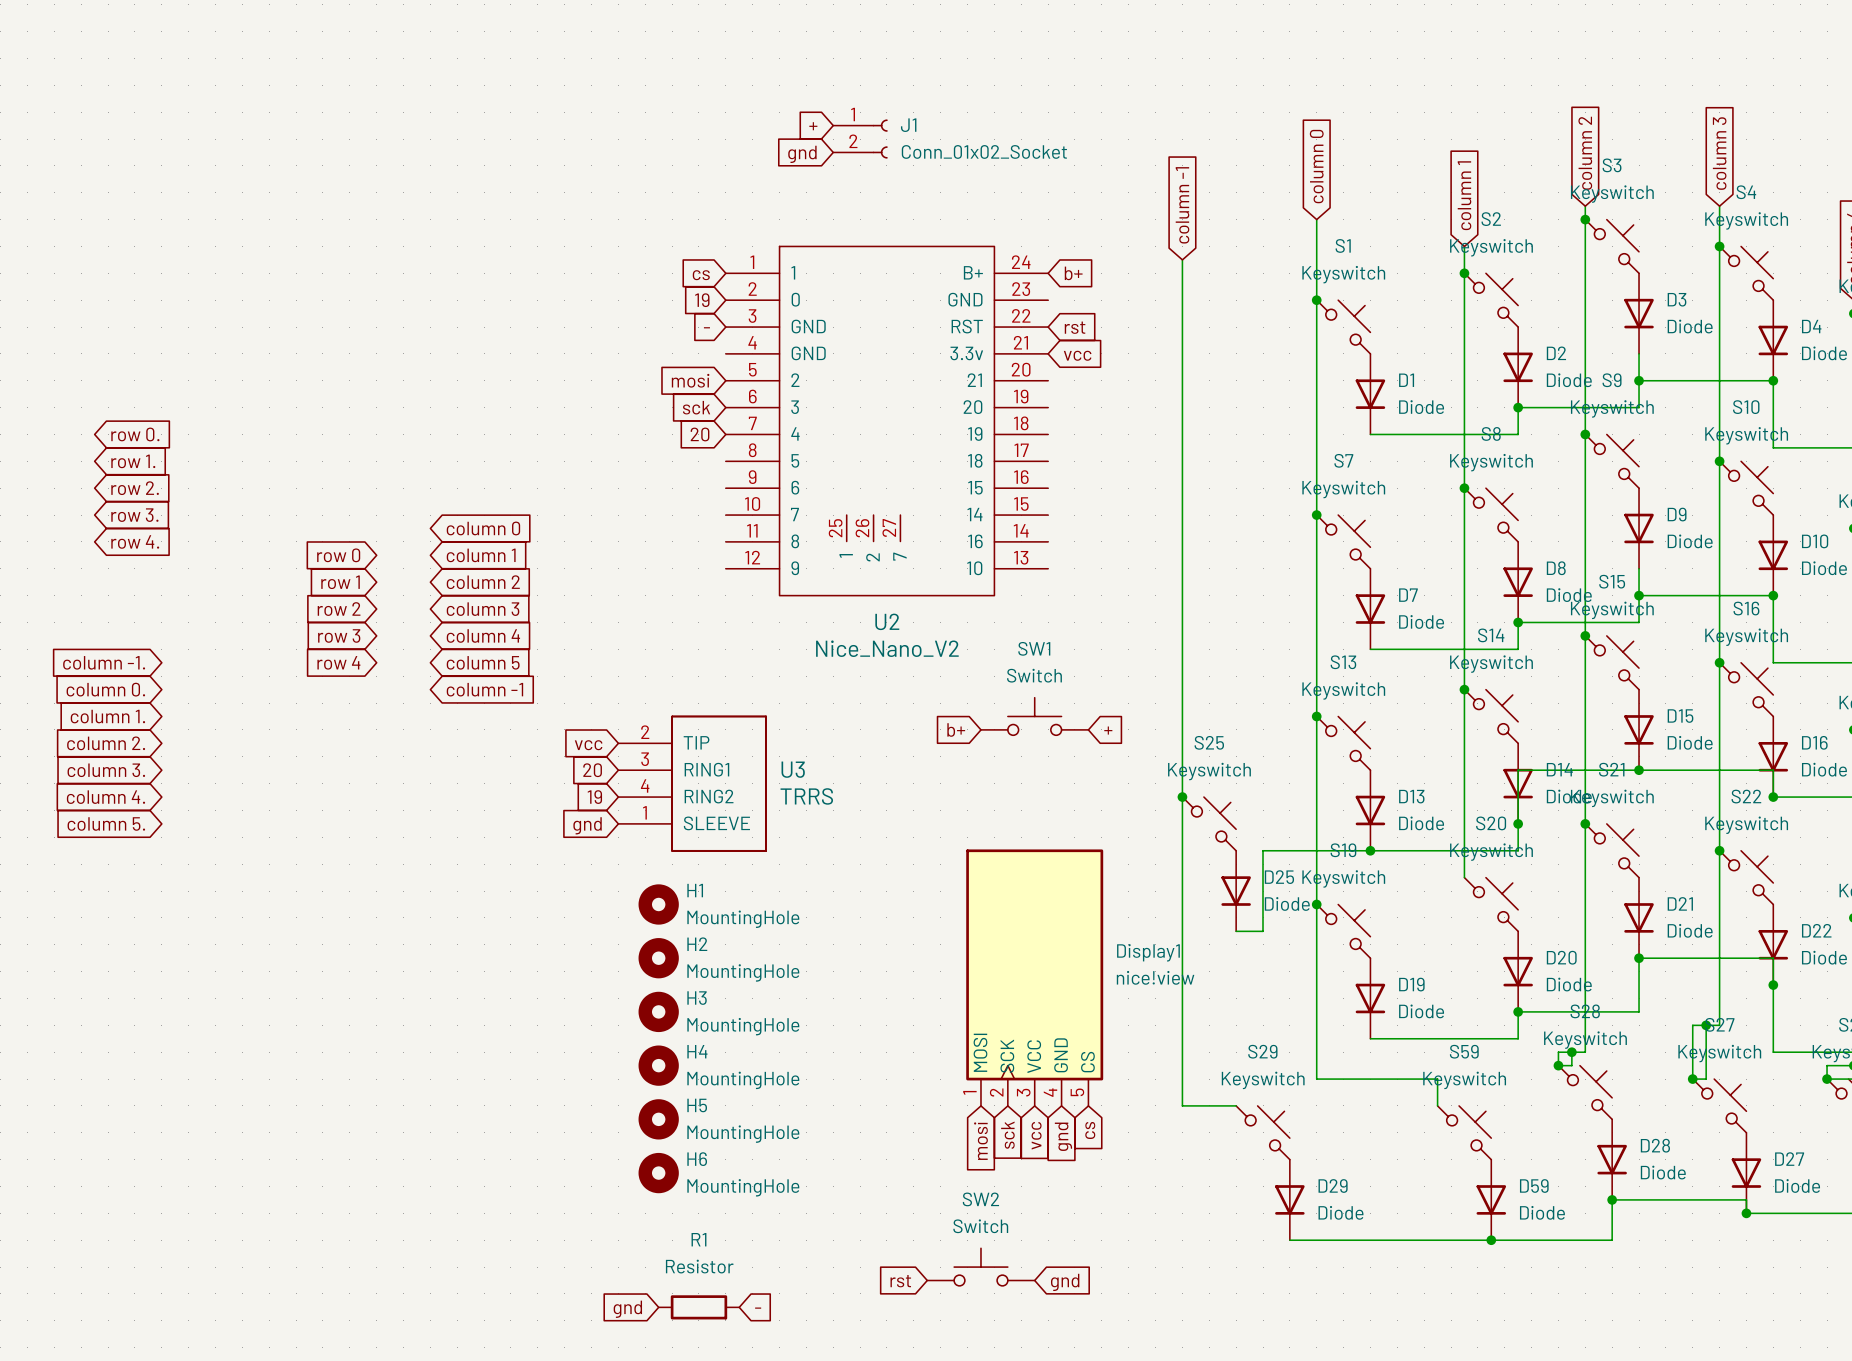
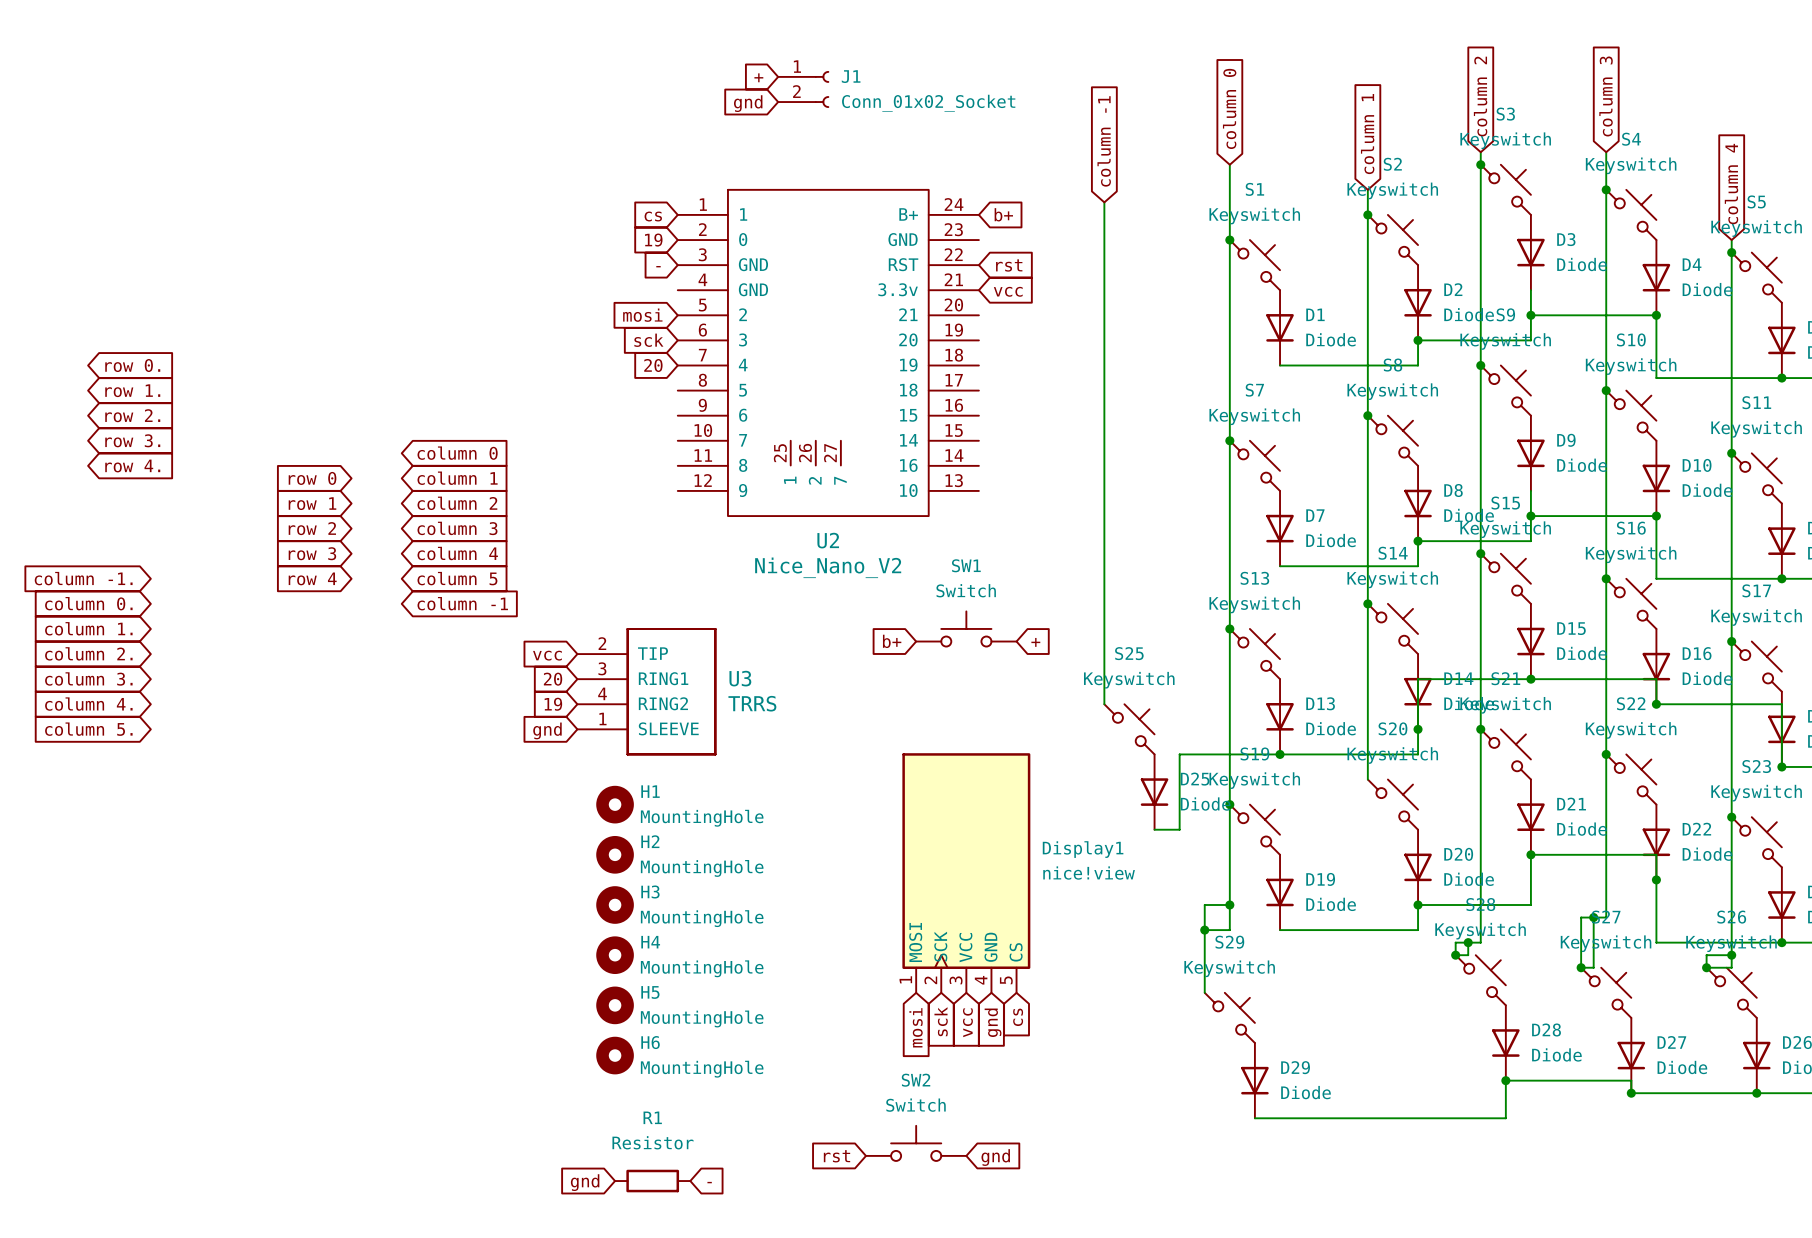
wire: (1182, 797) (1182, 1105) (1236, 1105) -> none
junction: (1182, 797) -> none
wire: none -> (1229, 905) (1204, 905) (1204, 992)
junction: none -> (1229, 905)
junction: none -> (1204, 930)
wire: (1316, 1038) (1316, 1079) (1437, 1079) (1437, 1105) -> (1229, 930) (1204, 930)
S29 position: (1263, 1132) -> (1229, 1017)
S59: Keyswitch (1464, 1132) -> none
D29 position: (1289, 1199) -> (1254, 1080)
D59: Diode (1491, 1199) -> none
wire: (1289, 1240) (1343, 1240) -> none
junction: (1491, 1240) -> none

